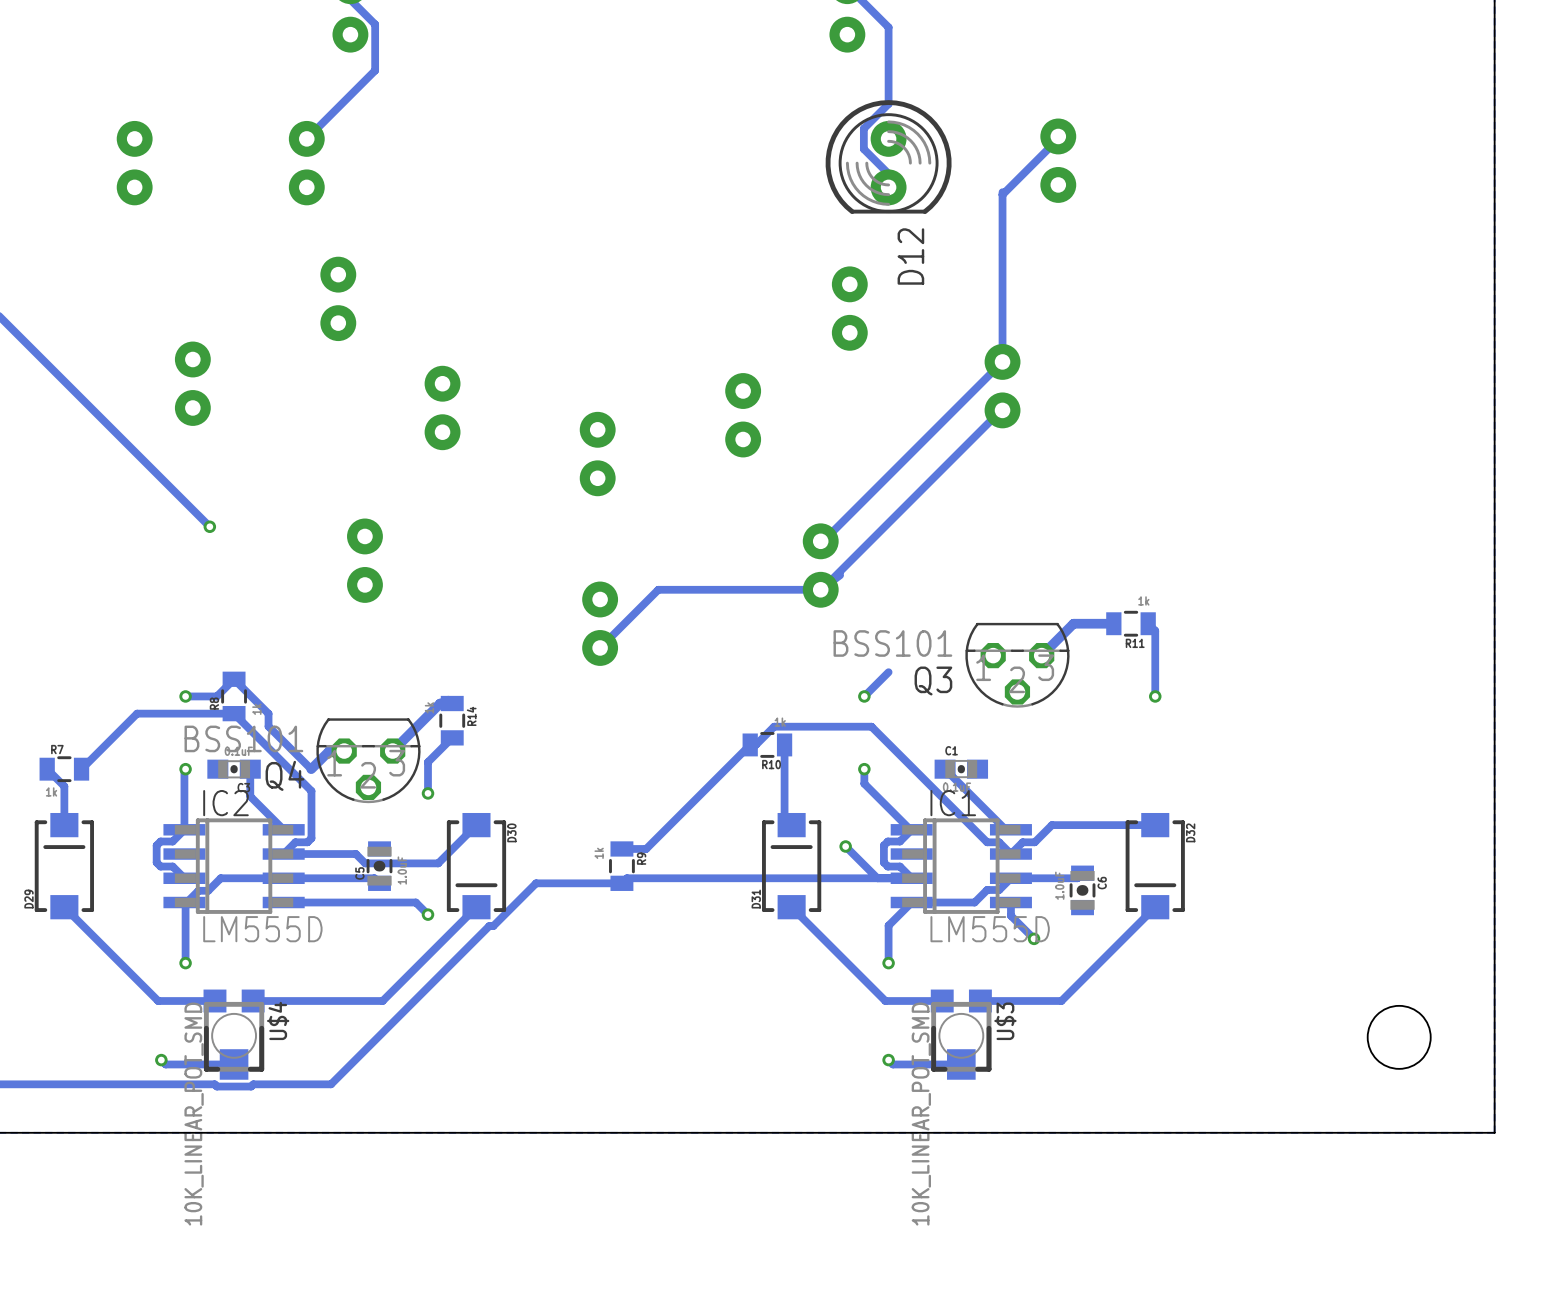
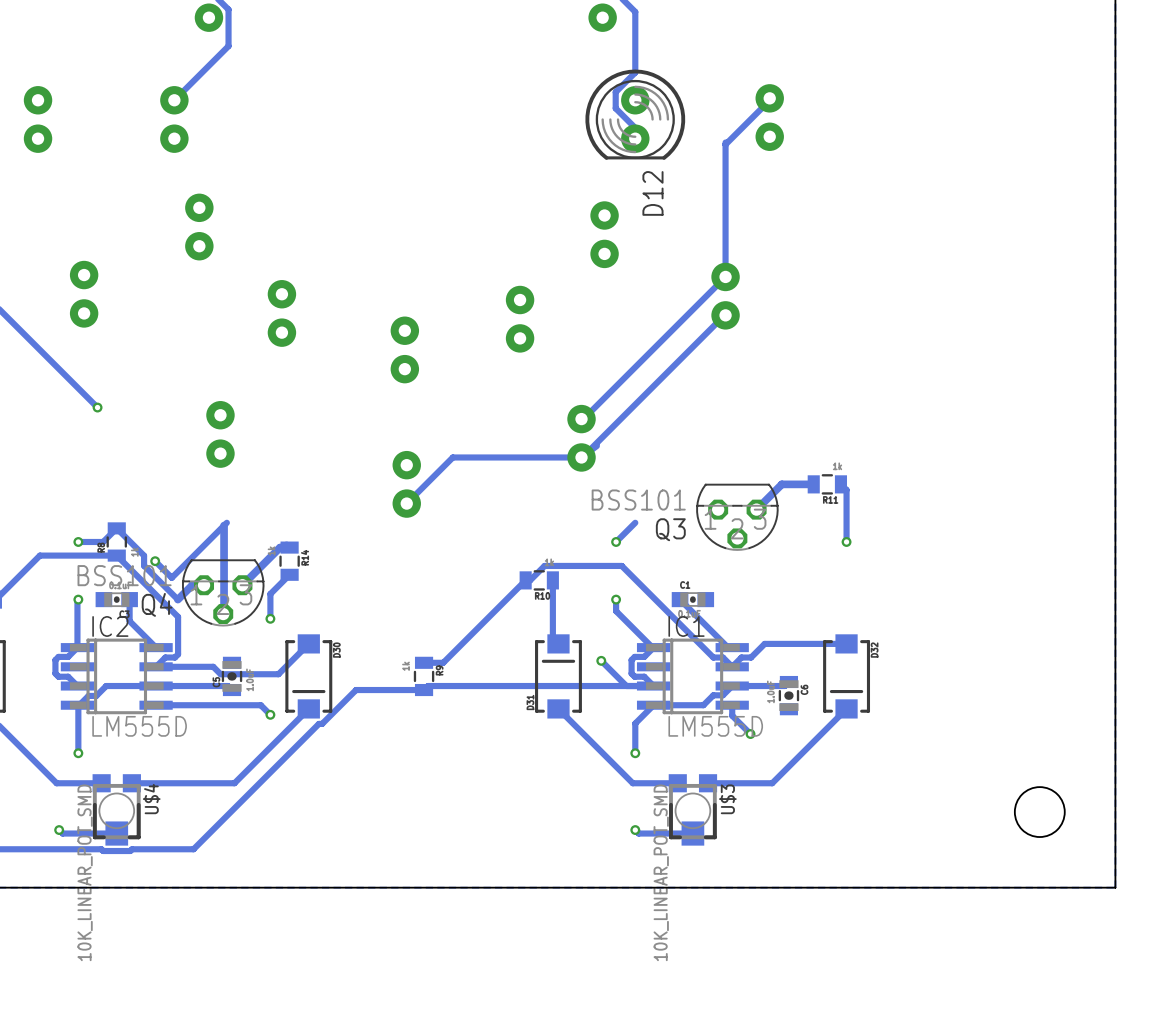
track: none -> (226, 522) (171, 577) (155, 561)
track: none -> (224, 525) (223, 614)
via: none -> (155, 561)

